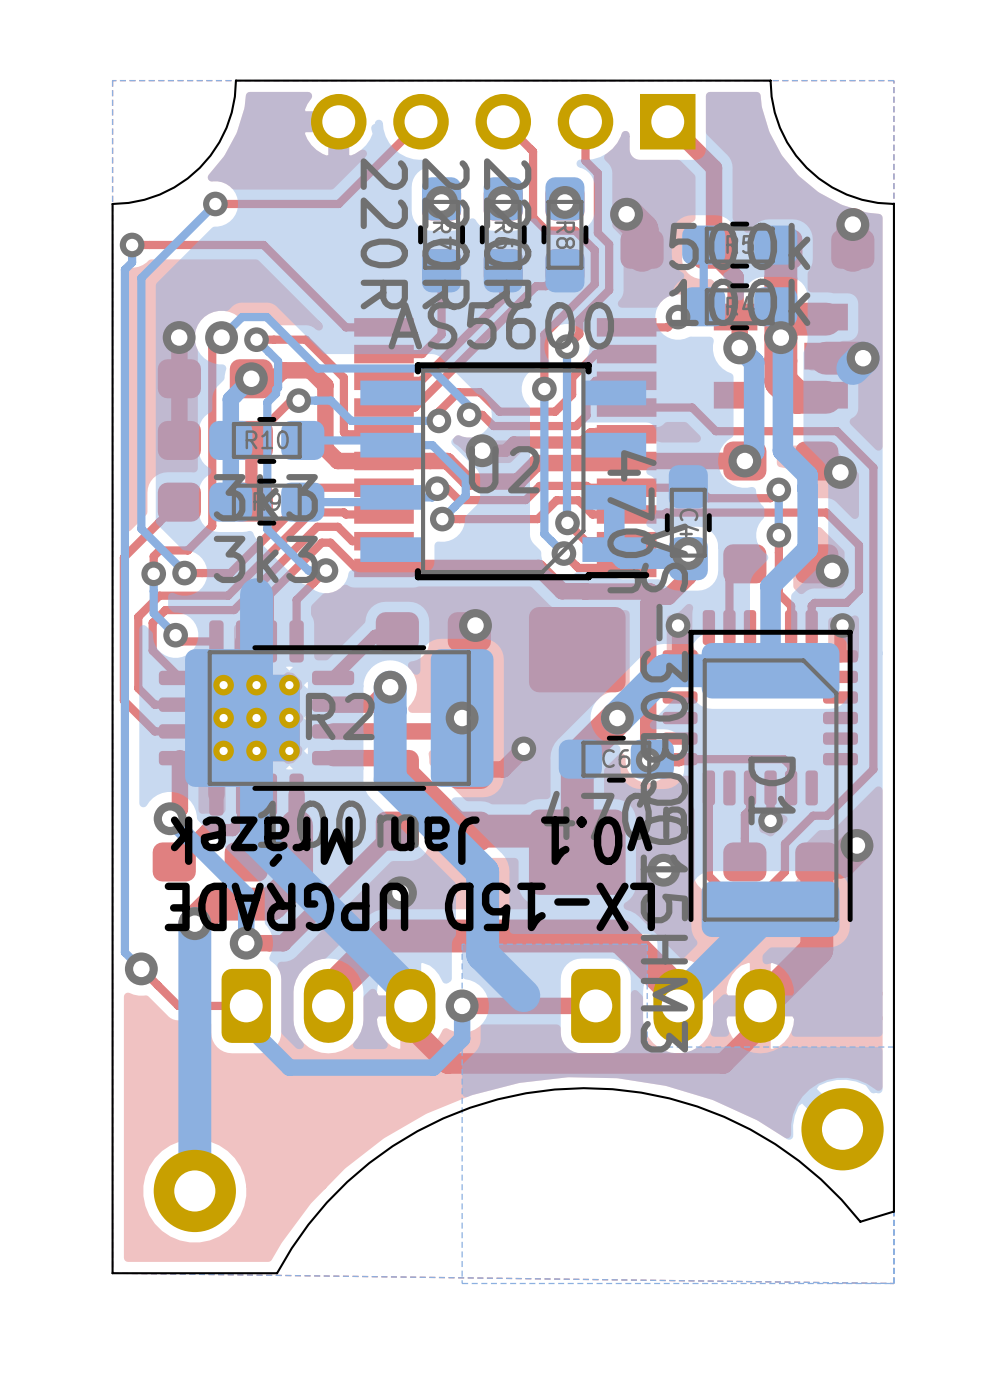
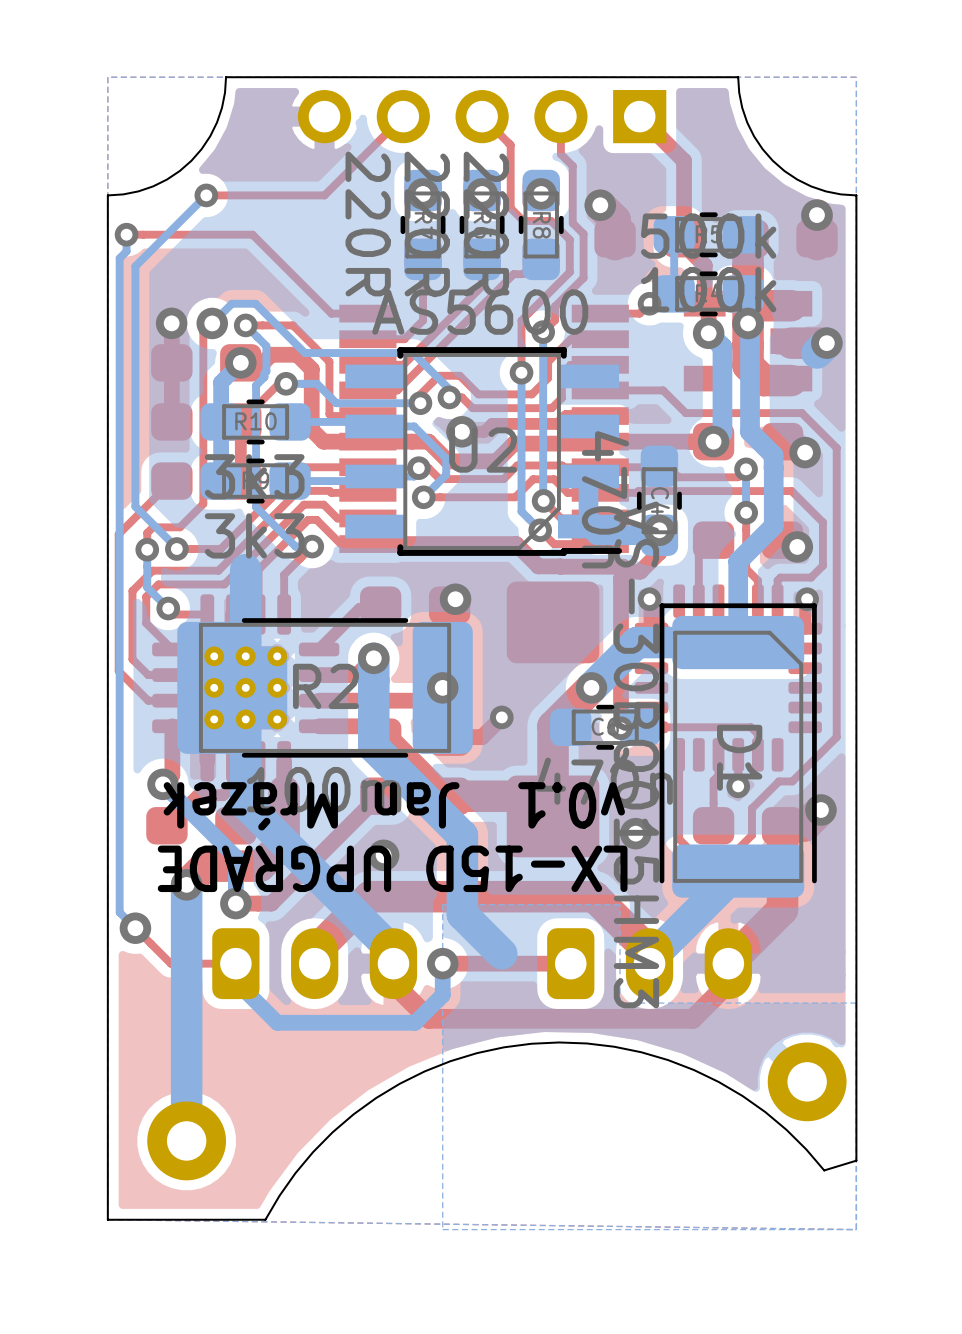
C6 position: (616, 759) -> (605, 727)

